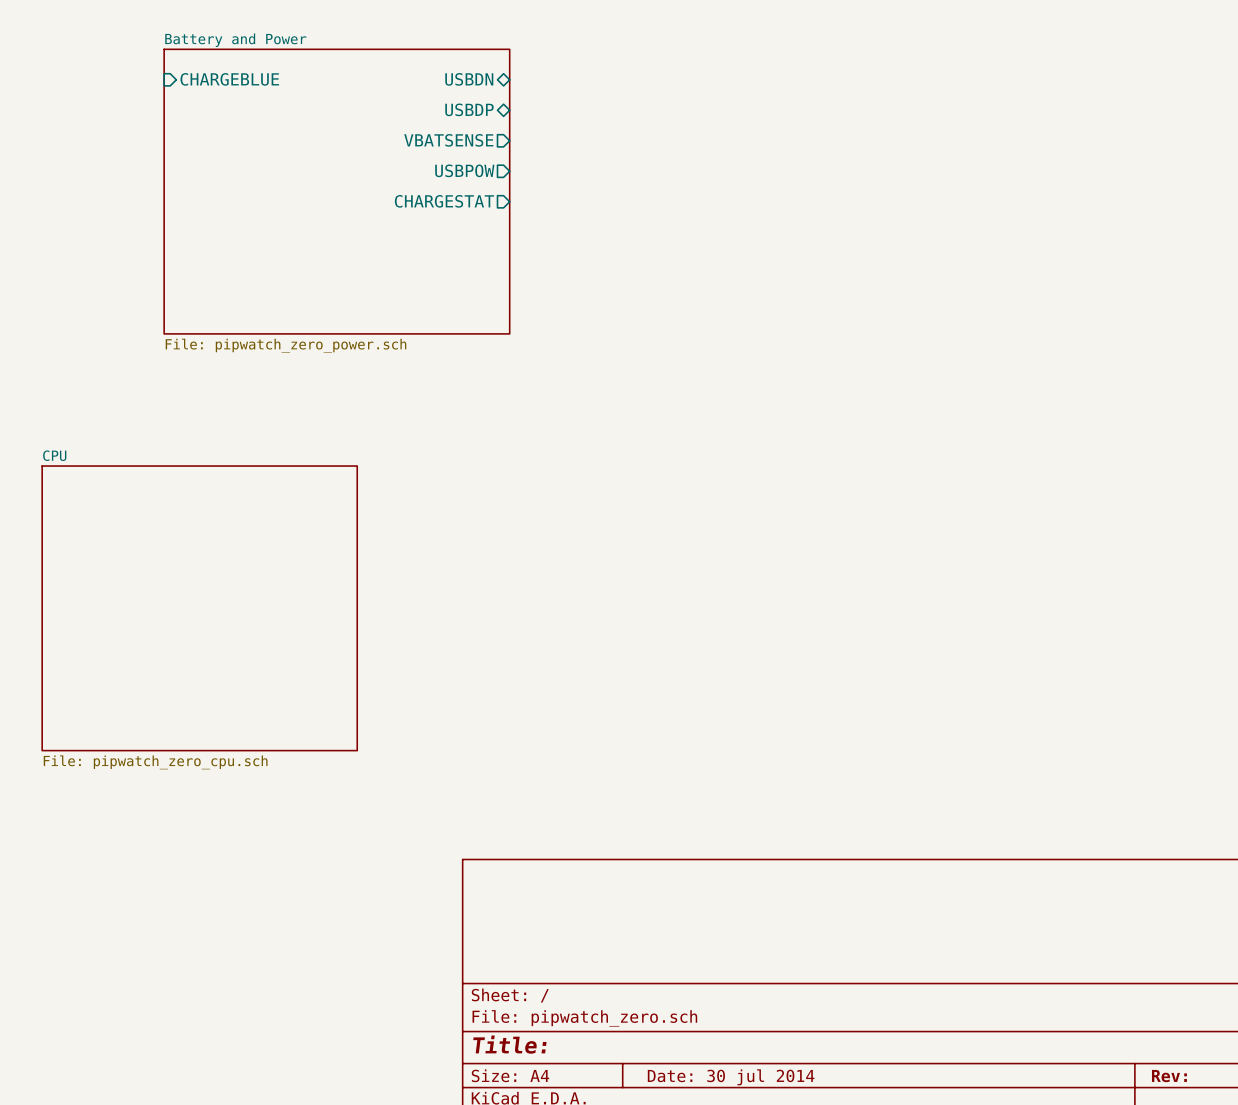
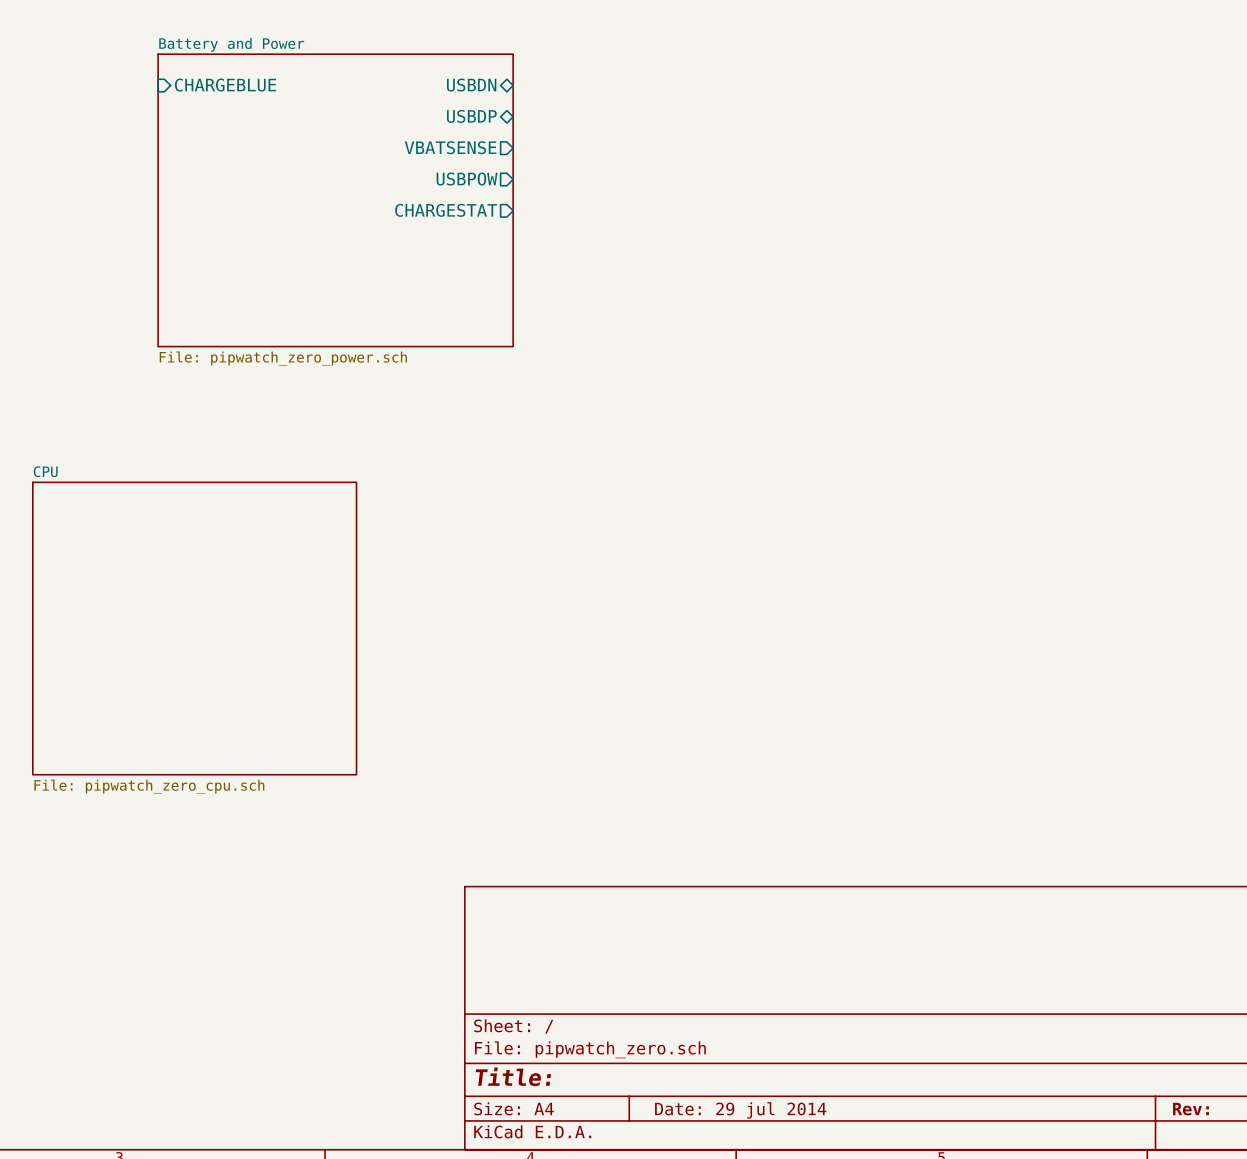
title block: Date: 30 jul 2014 (731, 1077) -> Date: 29 jul 2014 (740, 1110)

